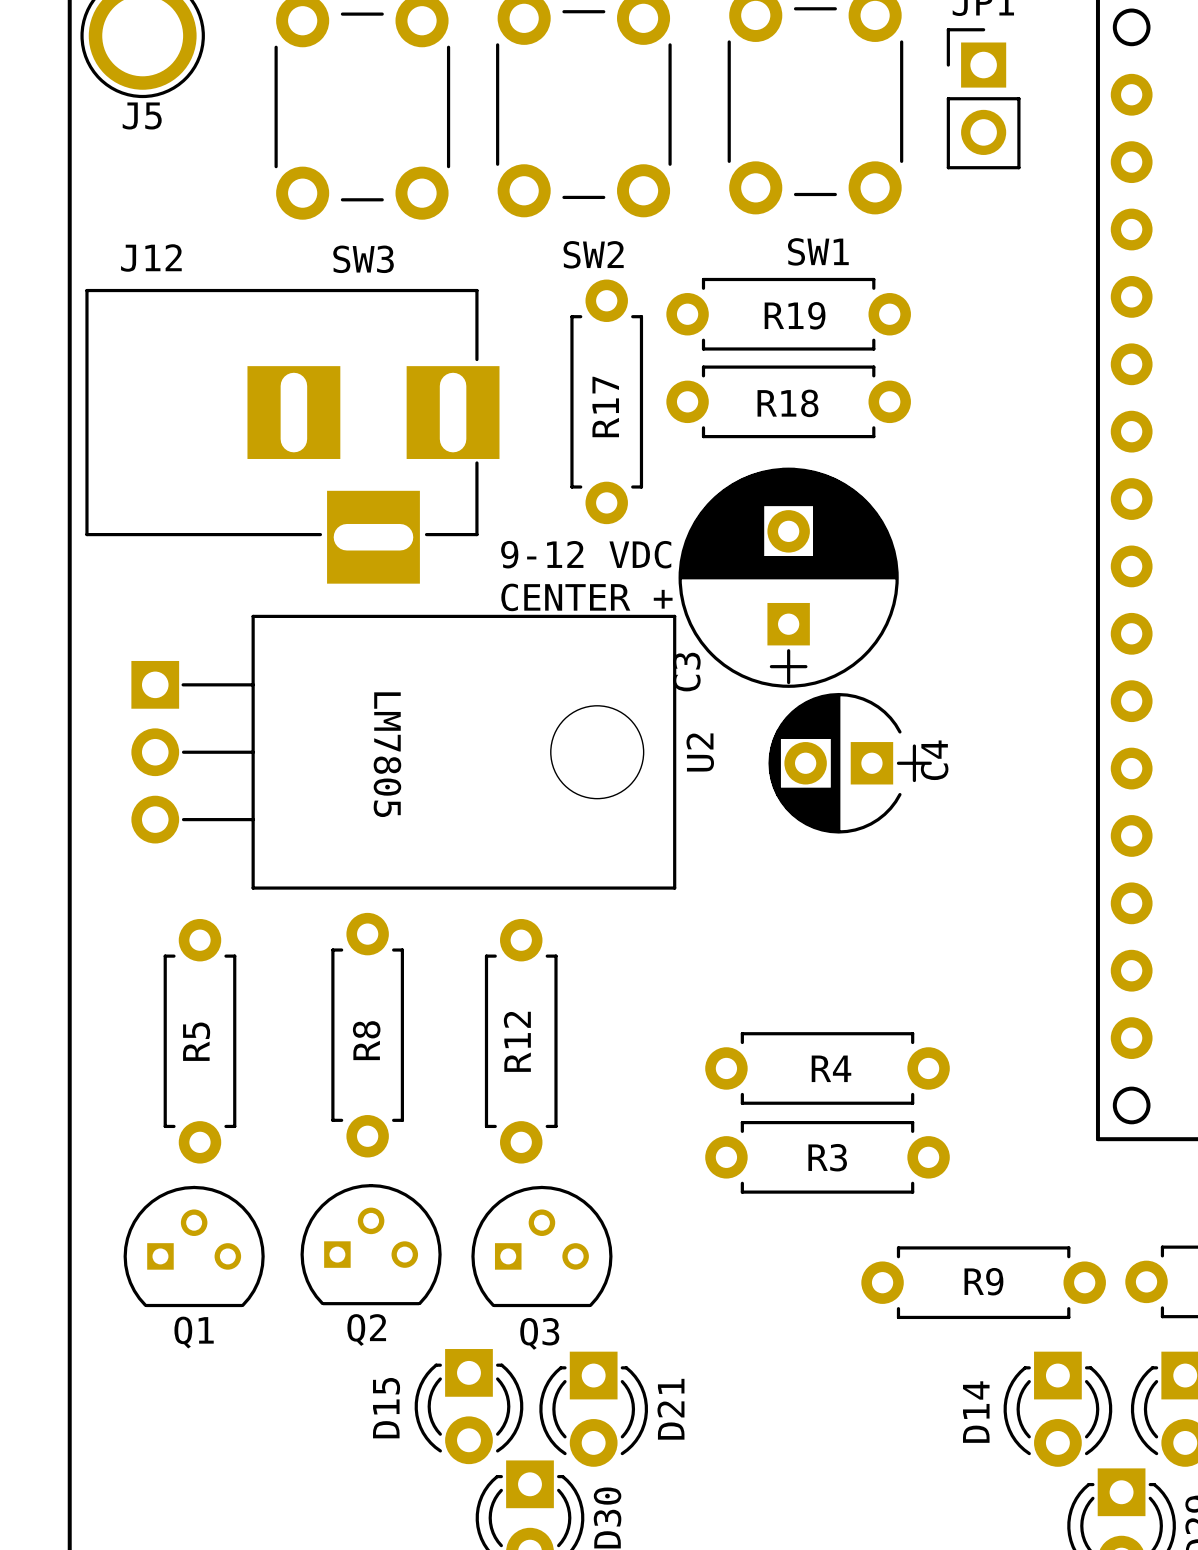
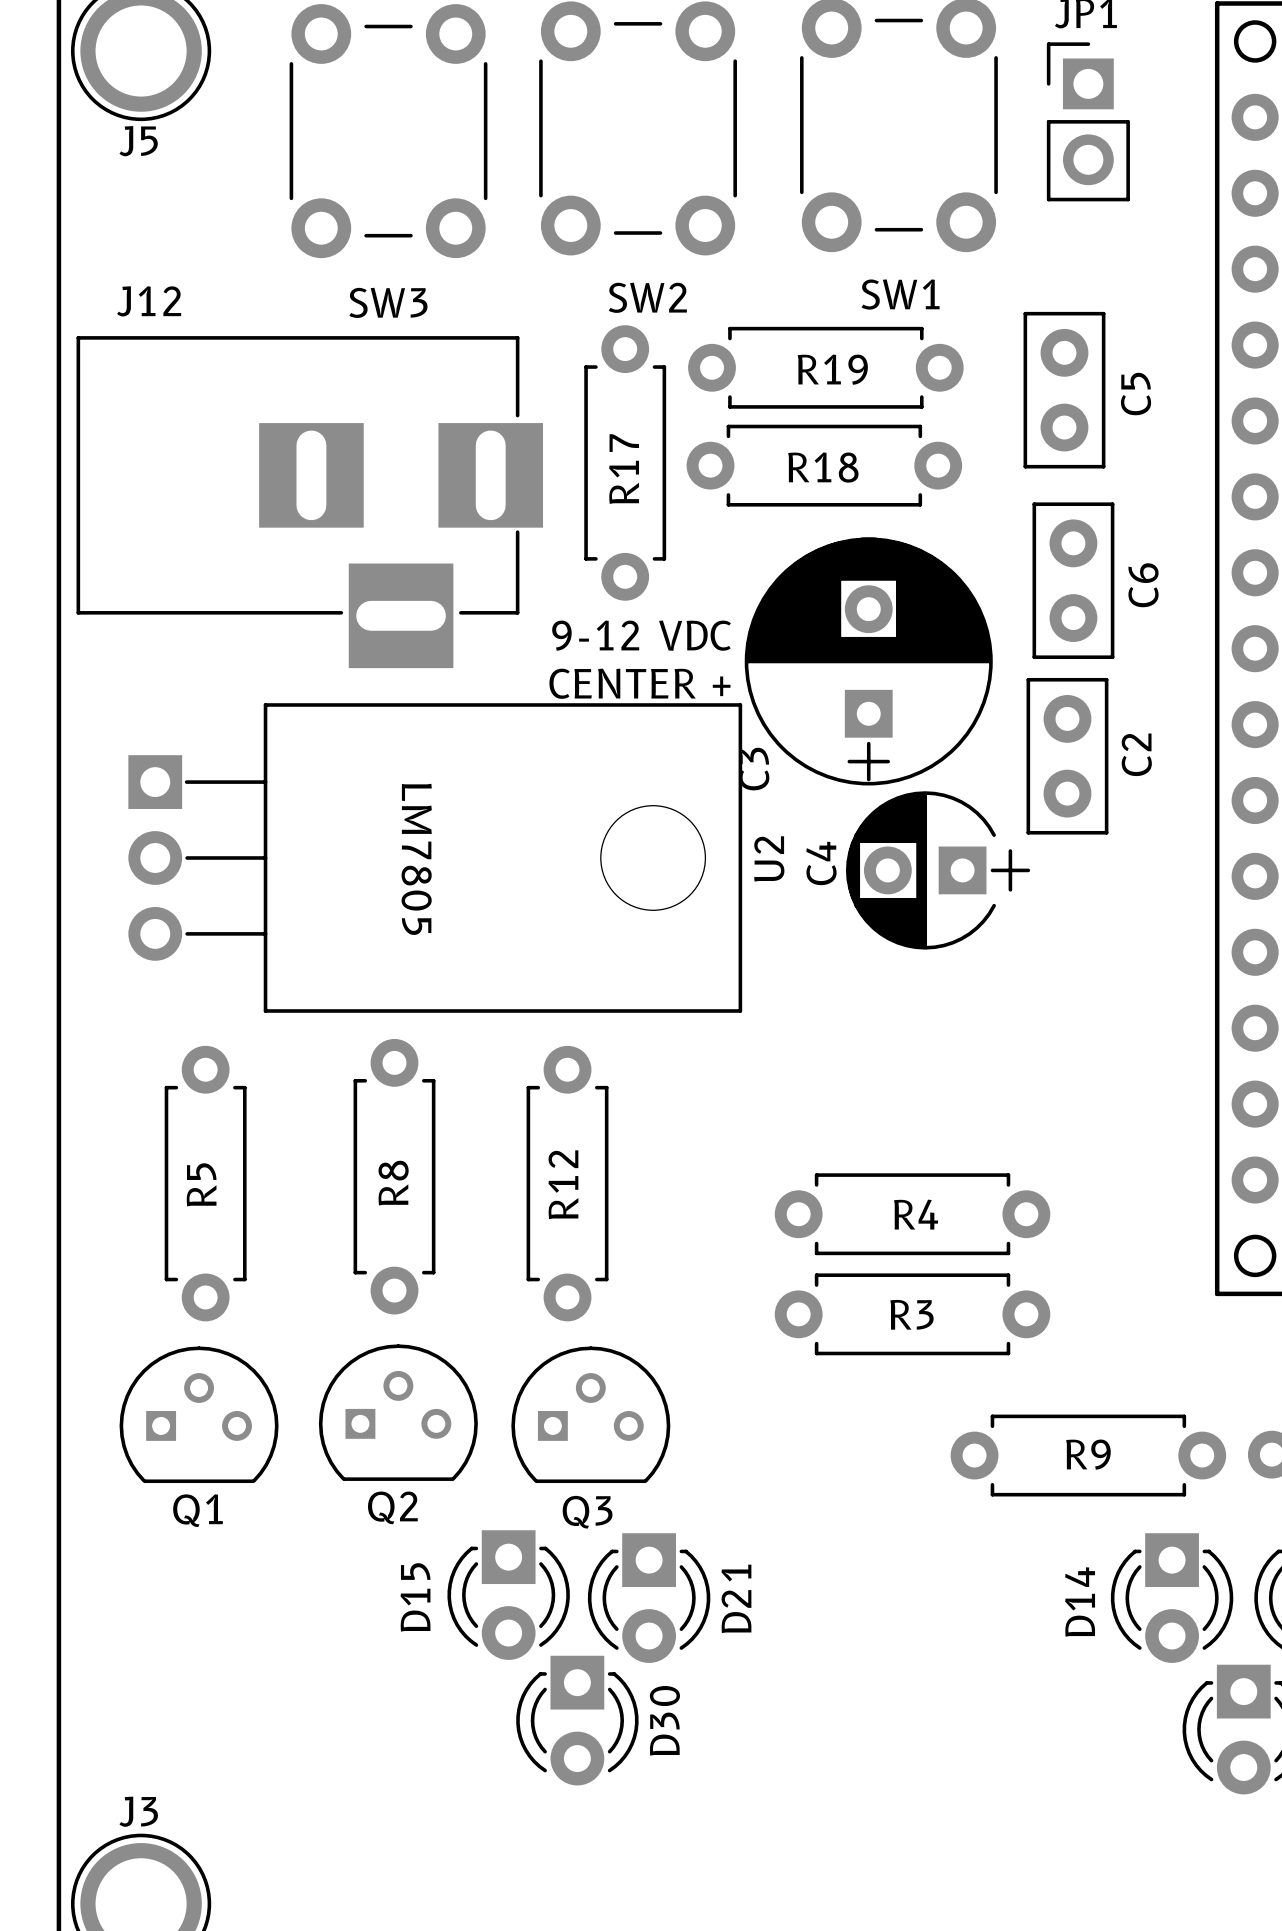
R19 position: (788, 314) -> (825, 367)
C5: none -> (1064, 390)
R17 position: (606, 401) -> (625, 462)
R18 position: (788, 401) -> (824, 465)
C6: none -> (1073, 580)
C2: none -> (1067, 756)
C4 name position: C4 (934, 760) -> C4 (821, 863)

